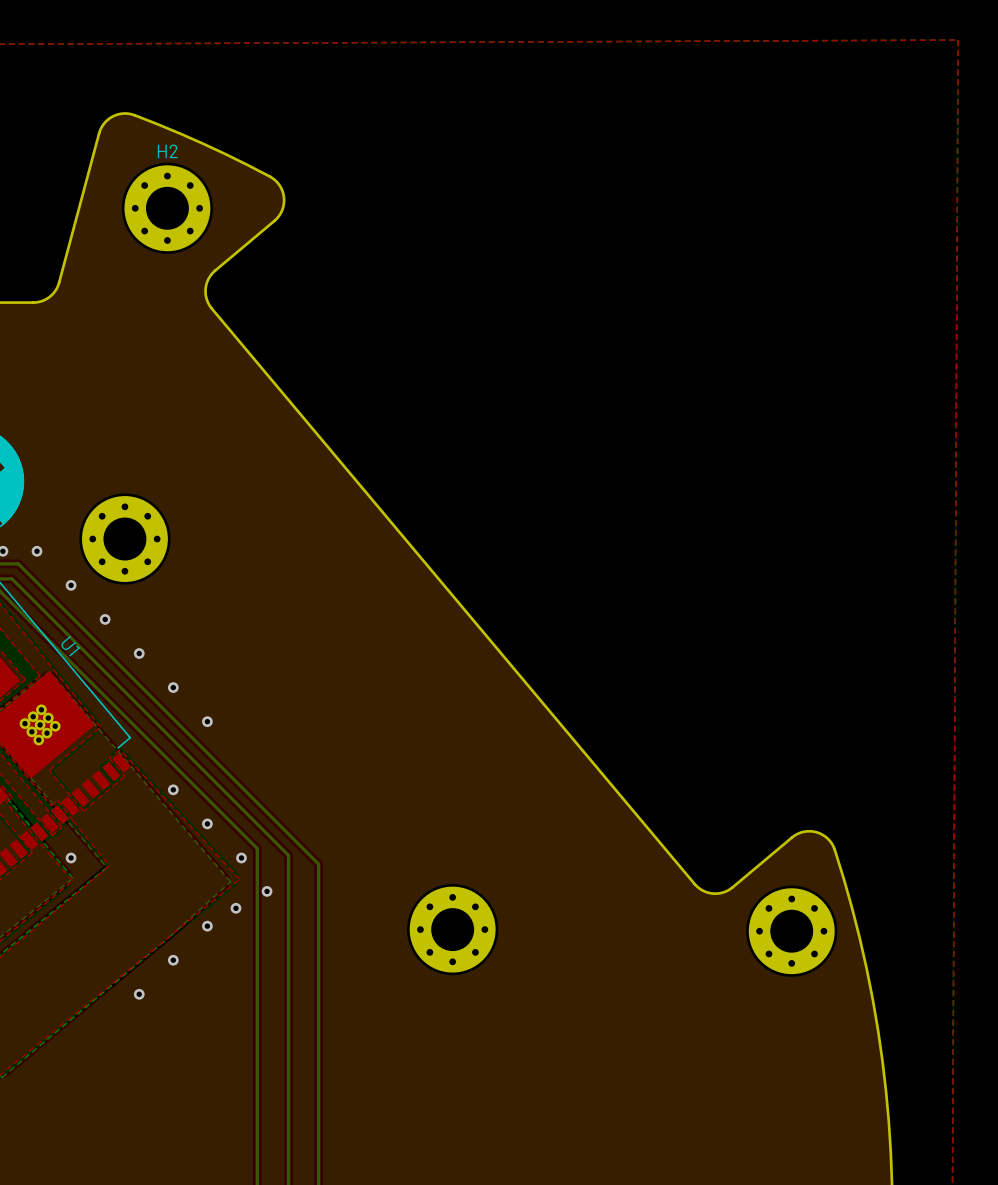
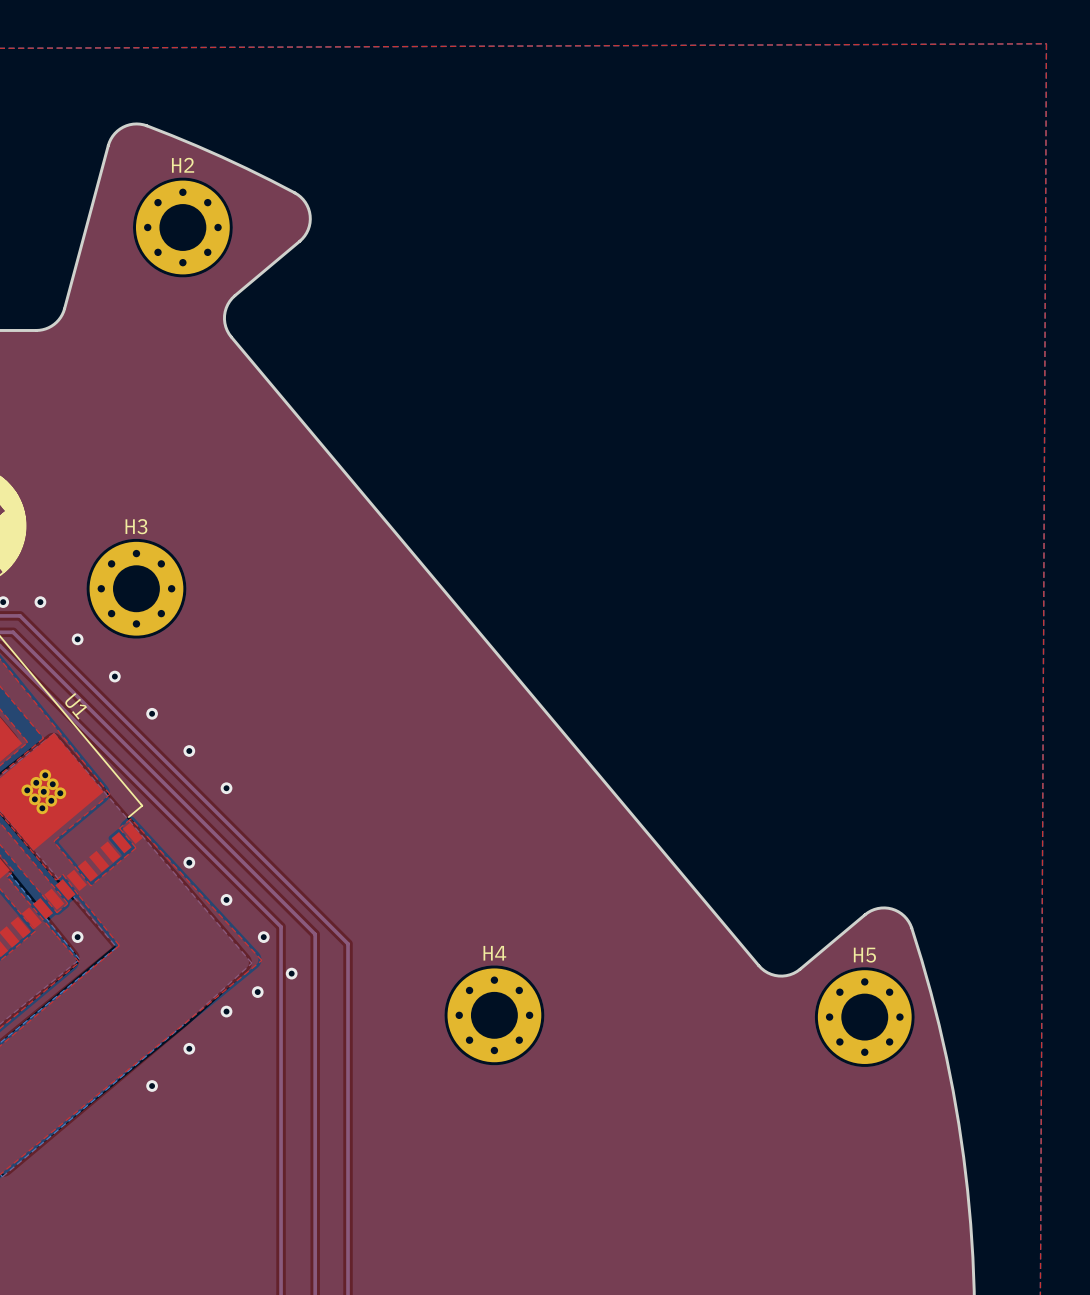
H3 name: none -> H3 (136, 526)
H4 name: none -> H4 (494, 953)
H5 name: none -> H5 (864, 955)

